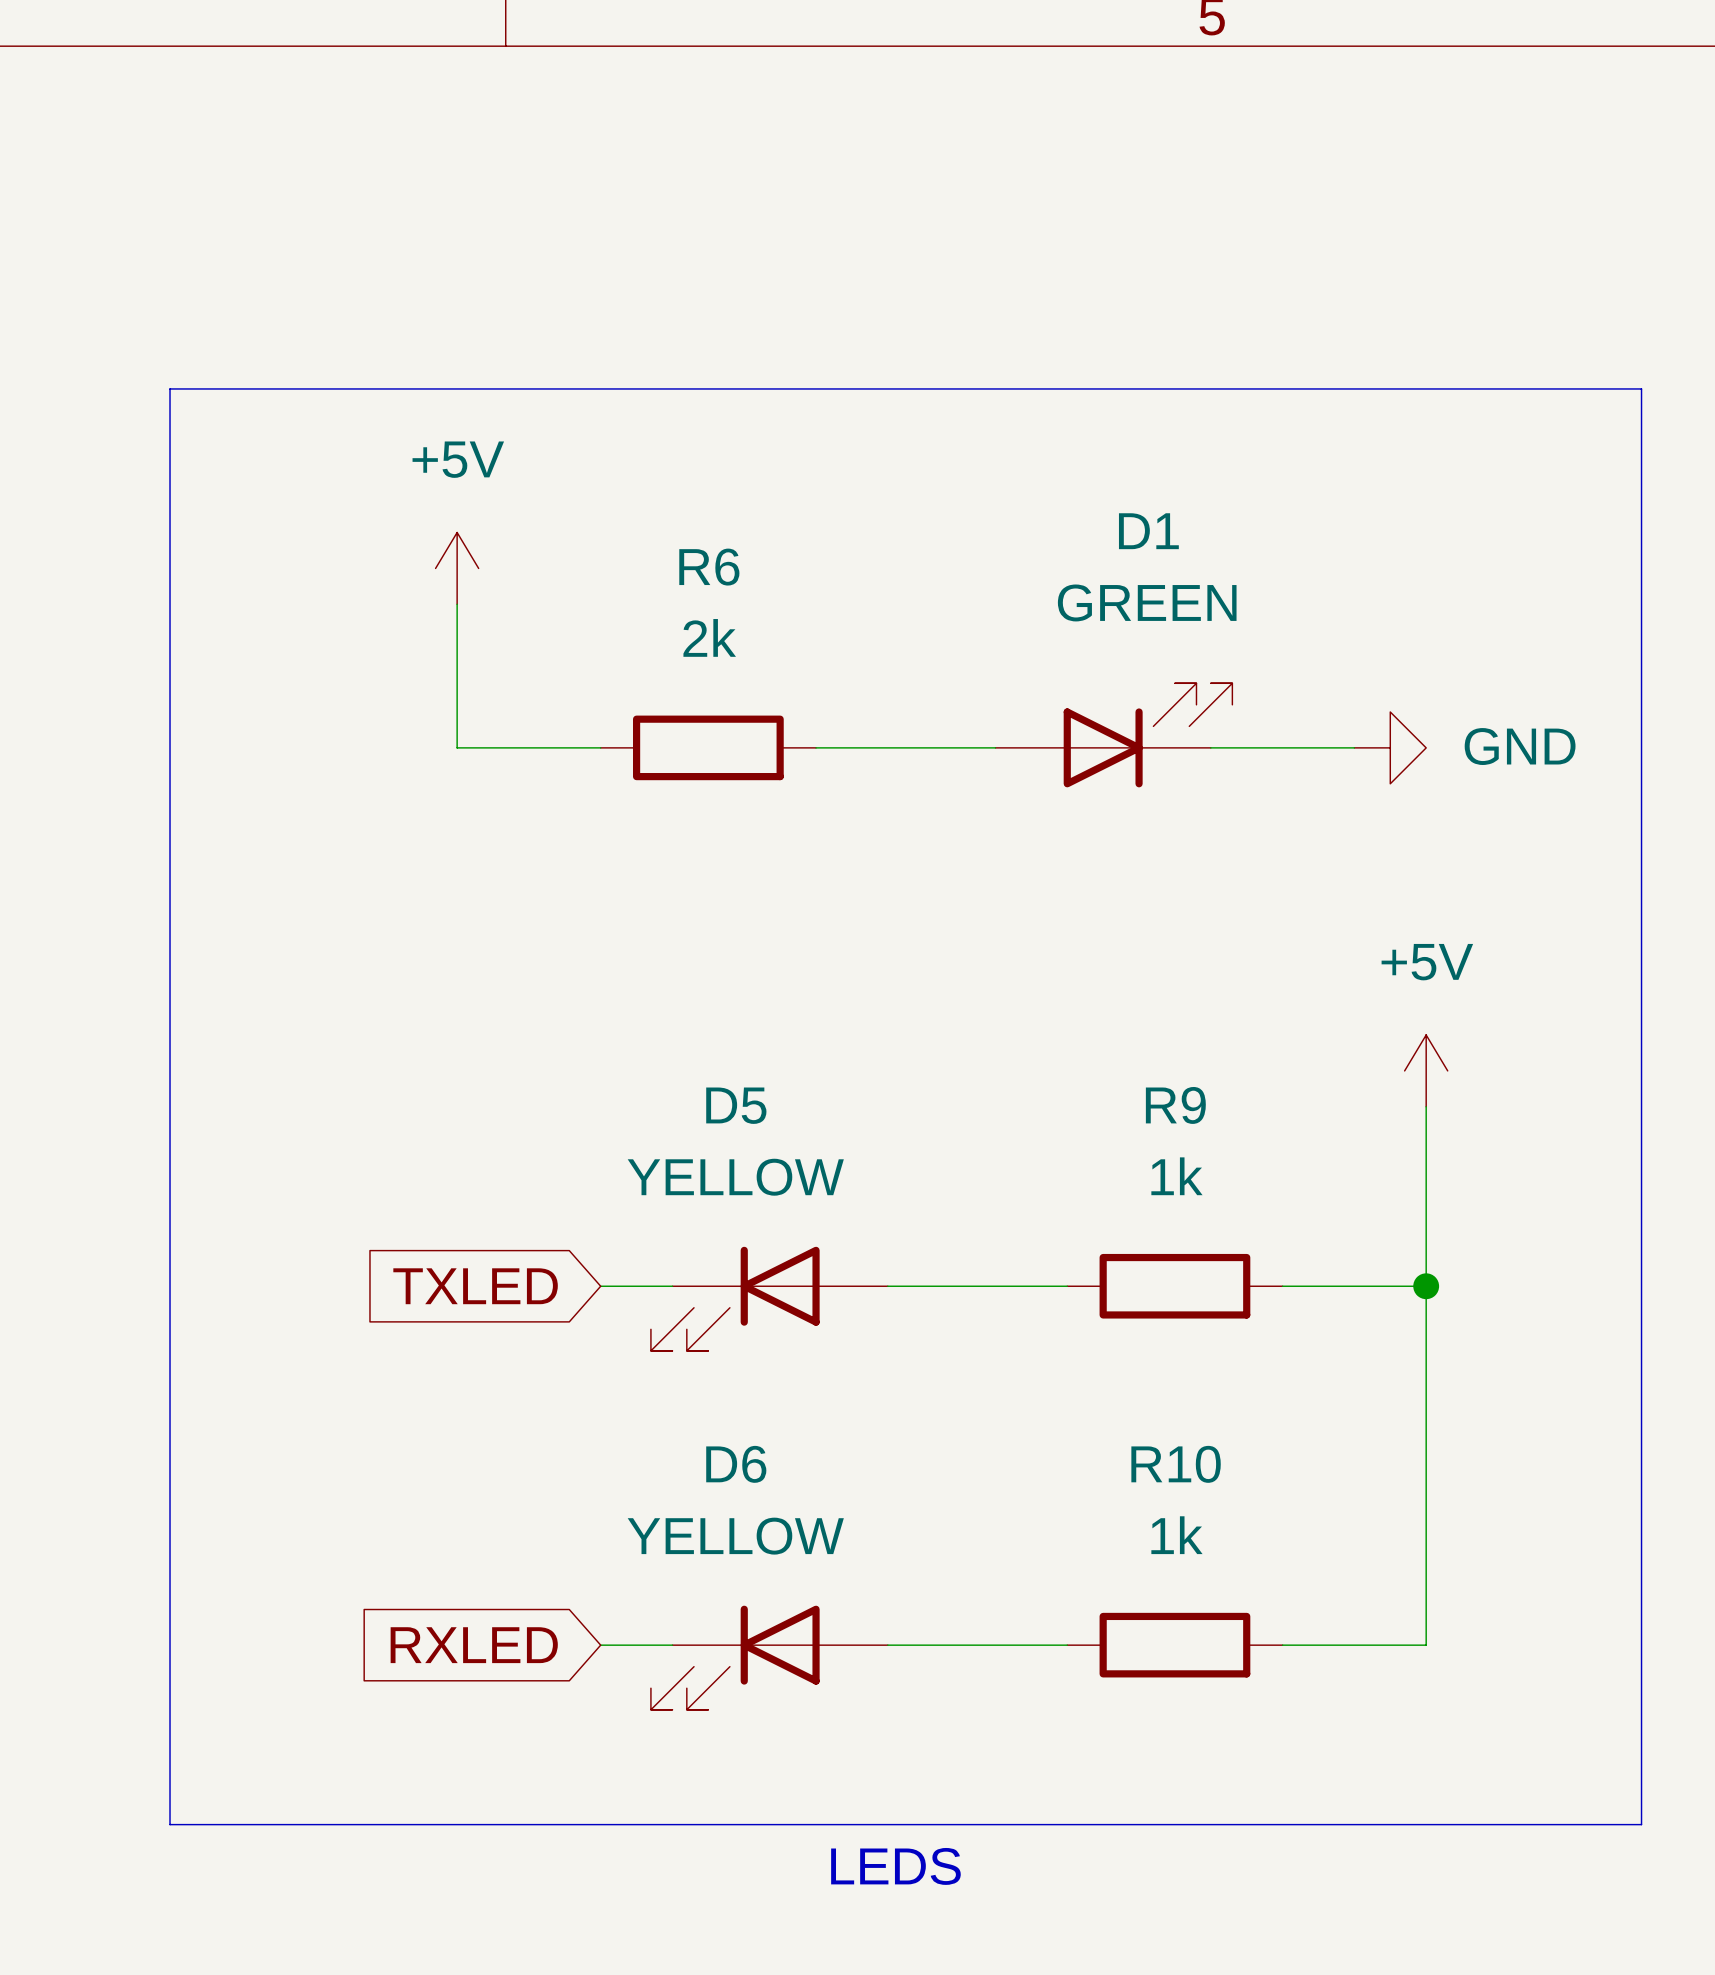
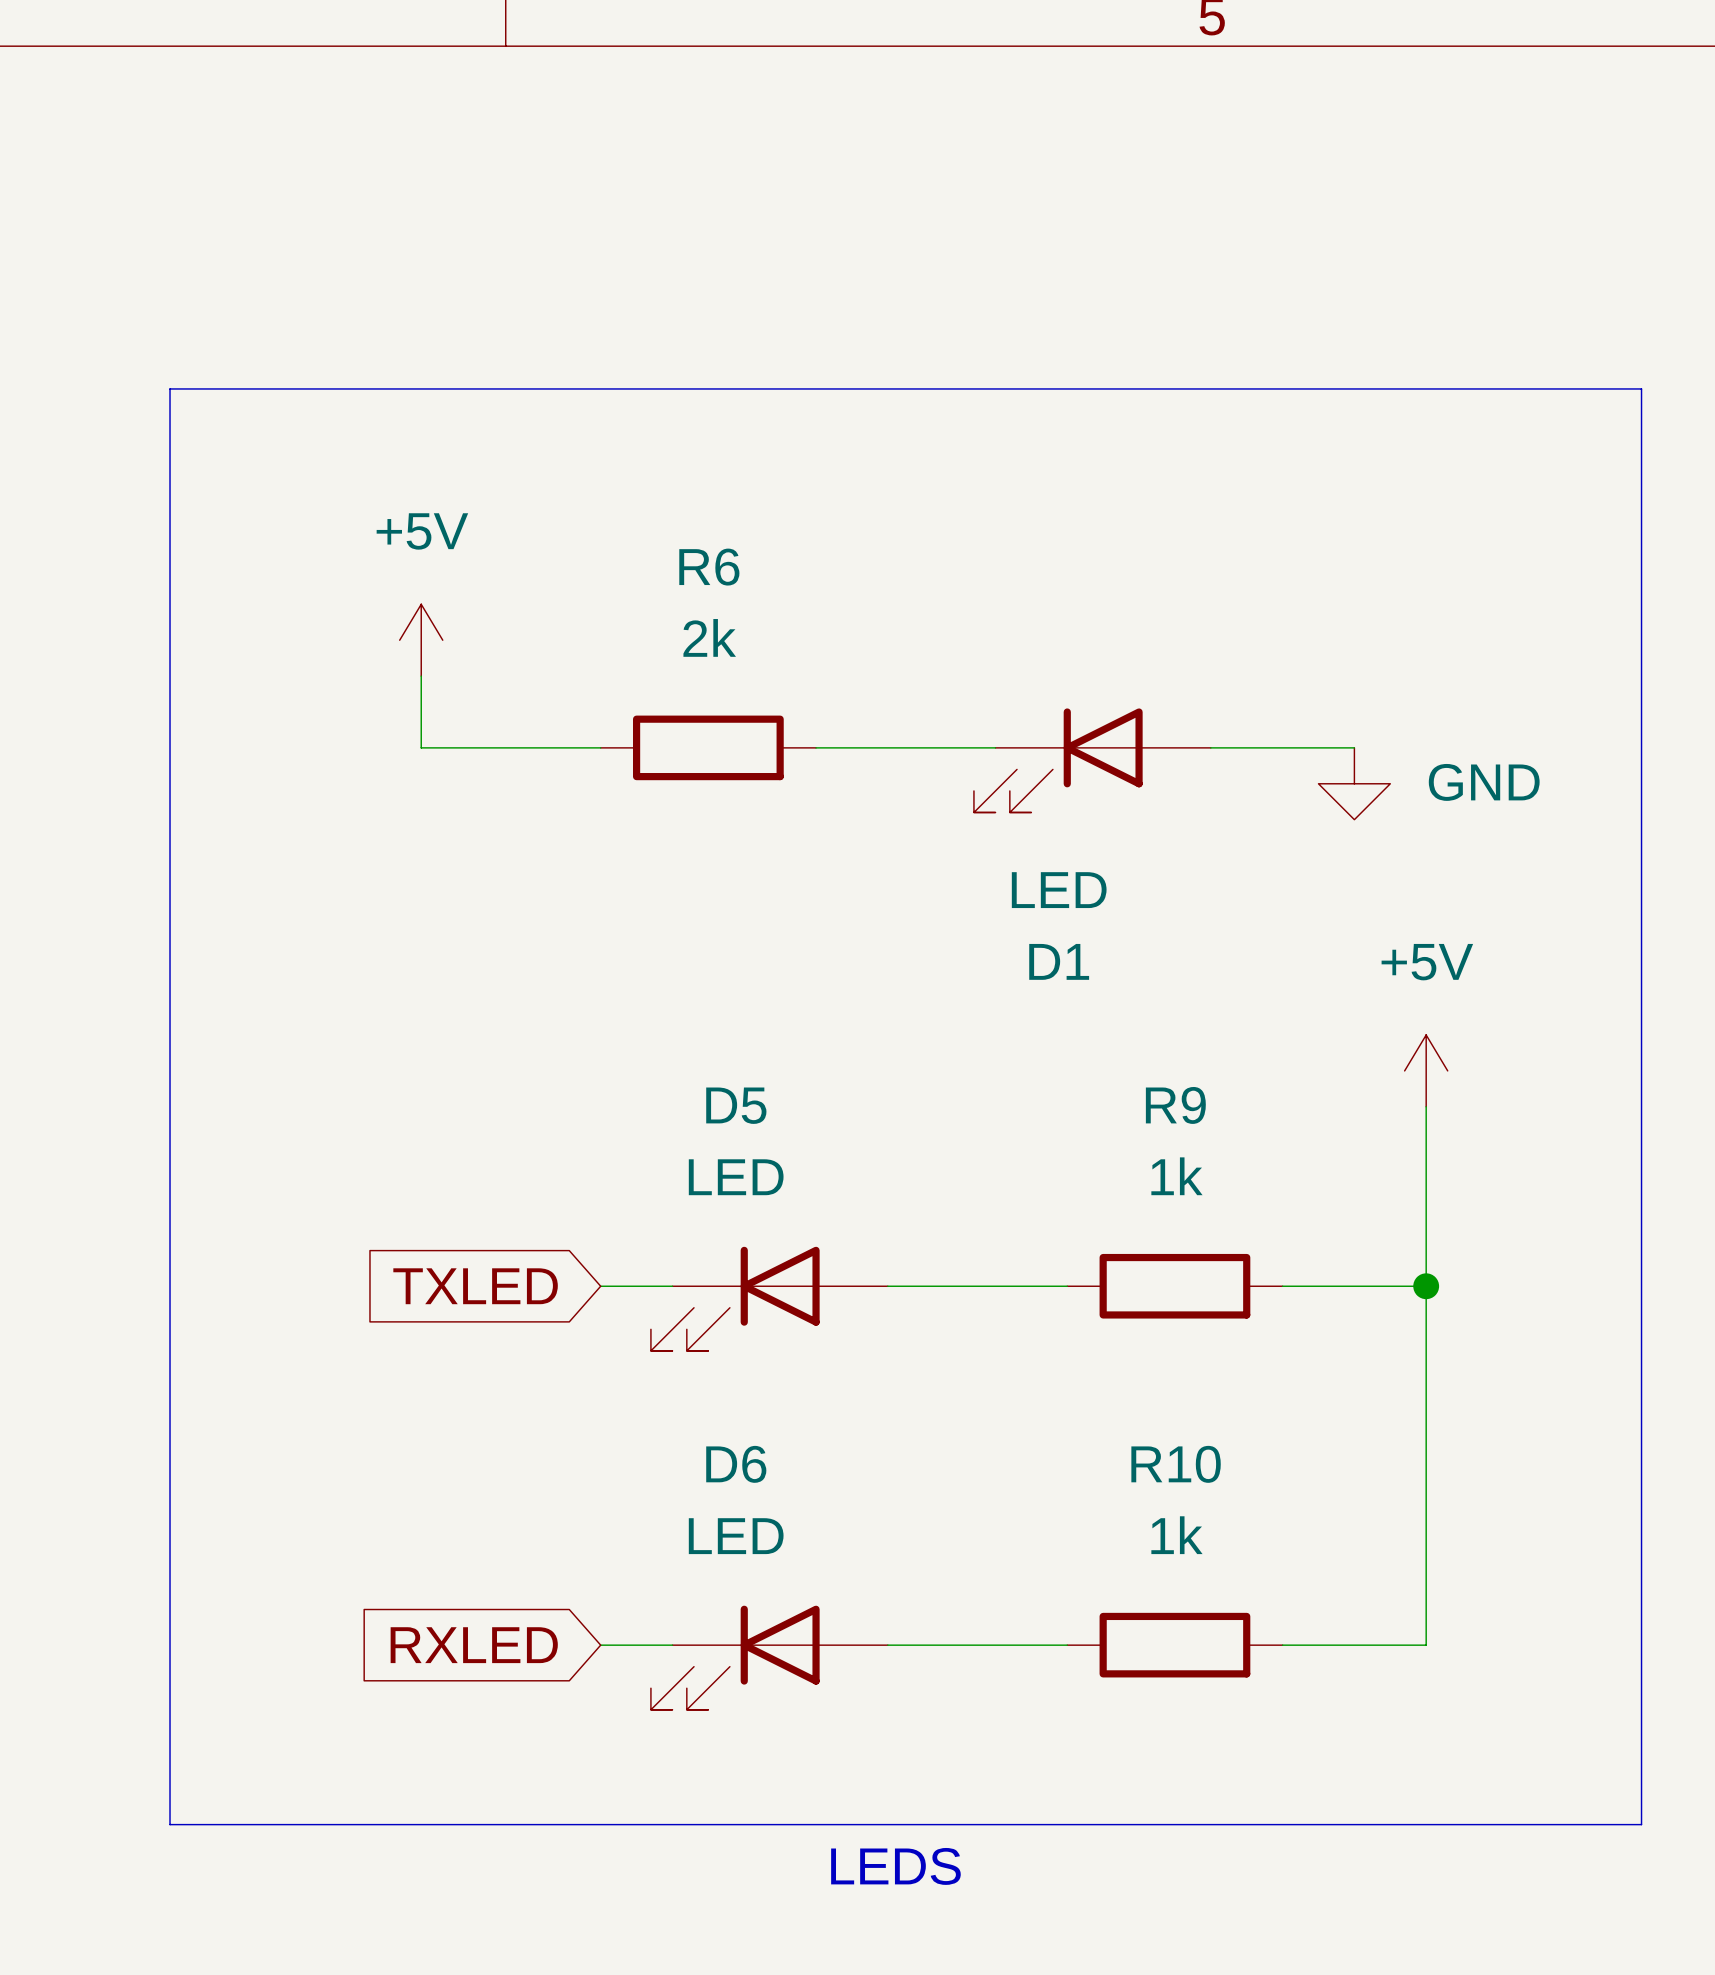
power symbol position: +5V (457, 568) -> +5V (421, 640)
D1 value: GREEN (1147, 602) -> LED (1059, 890)
wire: (457, 604) (457, 747) -> (421, 676) (421, 747) (457, 747)
D1 rotation: 0° (1148, 735) -> 180° (1058, 760)
power symbol rotation: 0° (1390, 747) -> 90° clockwise (1354, 783)
power symbol position: GND (1390, 747) -> GND (1354, 783)
D5 value: YELLOW (735, 1177) -> LED (736, 1177)
D6 value: YELLOW (735, 1536) -> LED (736, 1536)

